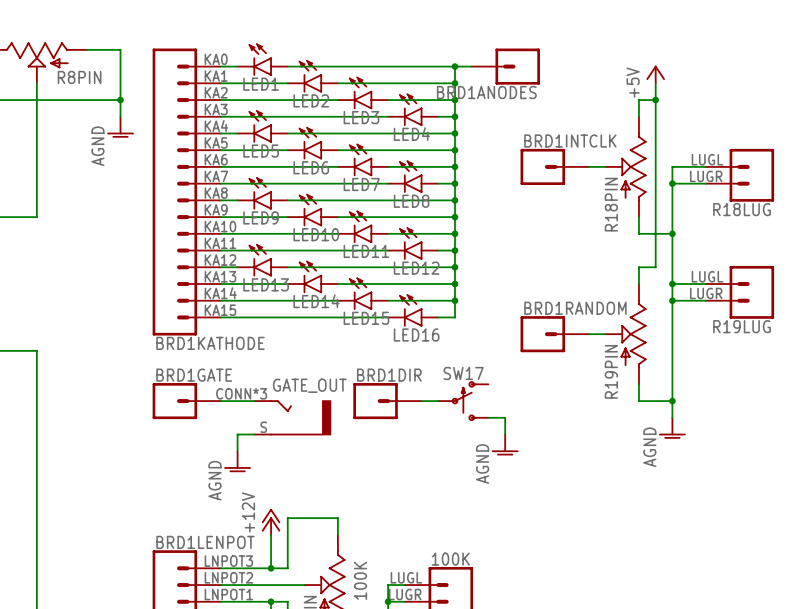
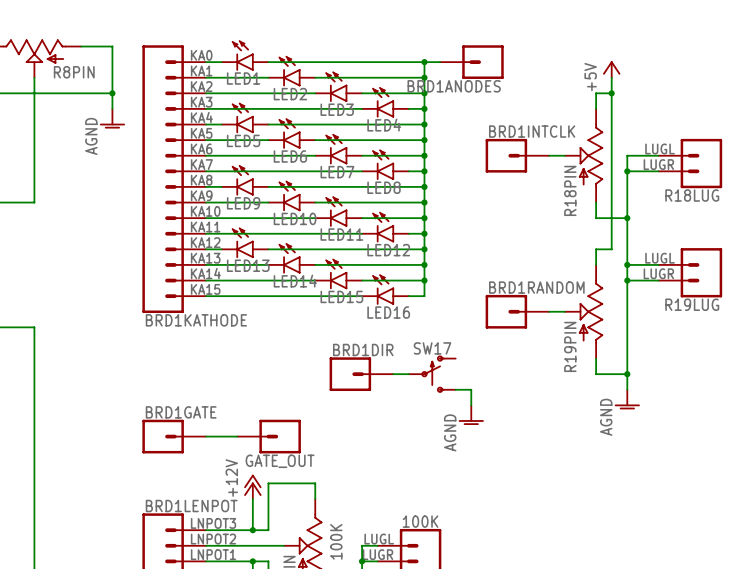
BRD1GATE position: (186, 401) -> (174, 436)
GATE_OUT: (292, 417) -> none
wire: (254, 434) (237, 434) (237, 451) -> none
power symbol: AGND (237, 461) -> none
GATE_OUT: none -> (269, 436)

